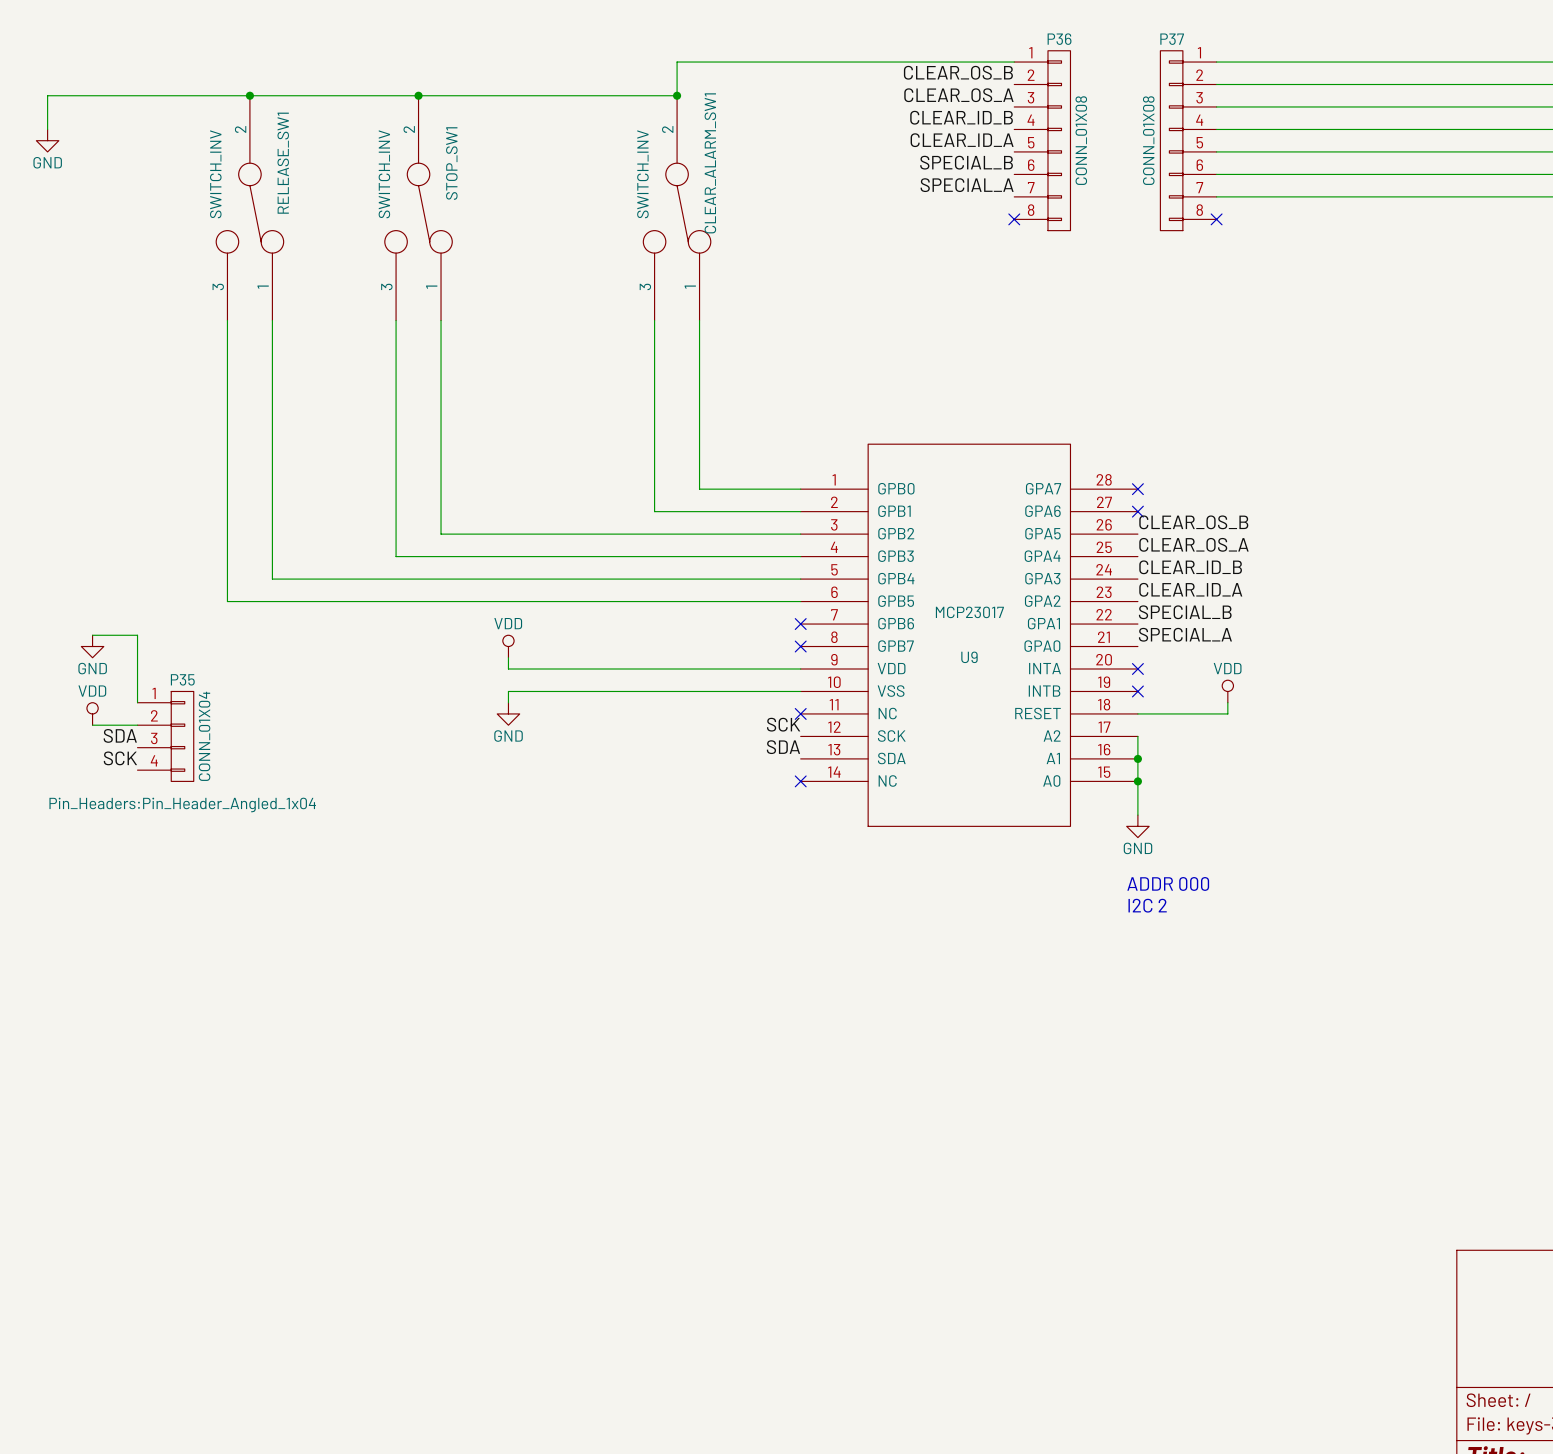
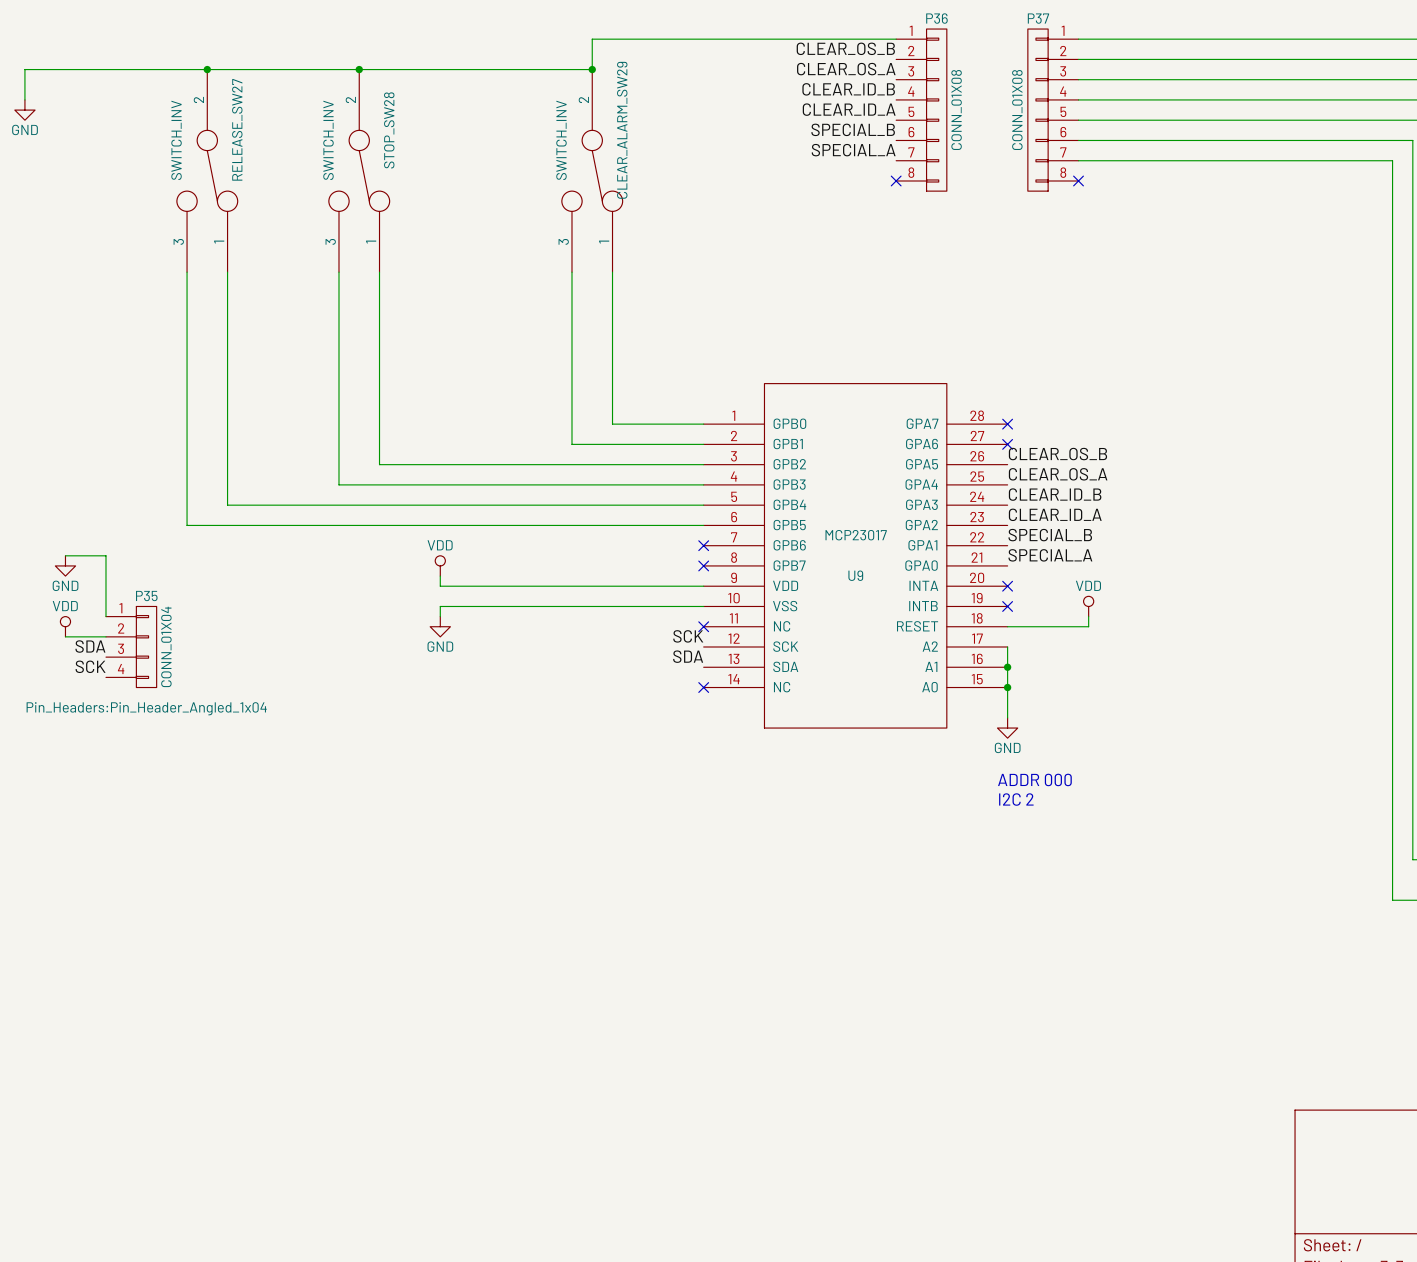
RELEASE_SW1 name: RELEASE_SW1 (283, 163) -> RELEASE_SW27 (237, 129)
STOP_SW1 name: STOP_SW1 (451, 163) -> STOP_SW28 (389, 130)
CLEAR_ALARM_SW1 name: CLEAR_ALARM_SW1 (710, 163) -> CLEAR_ALARM_SW29 (622, 130)

